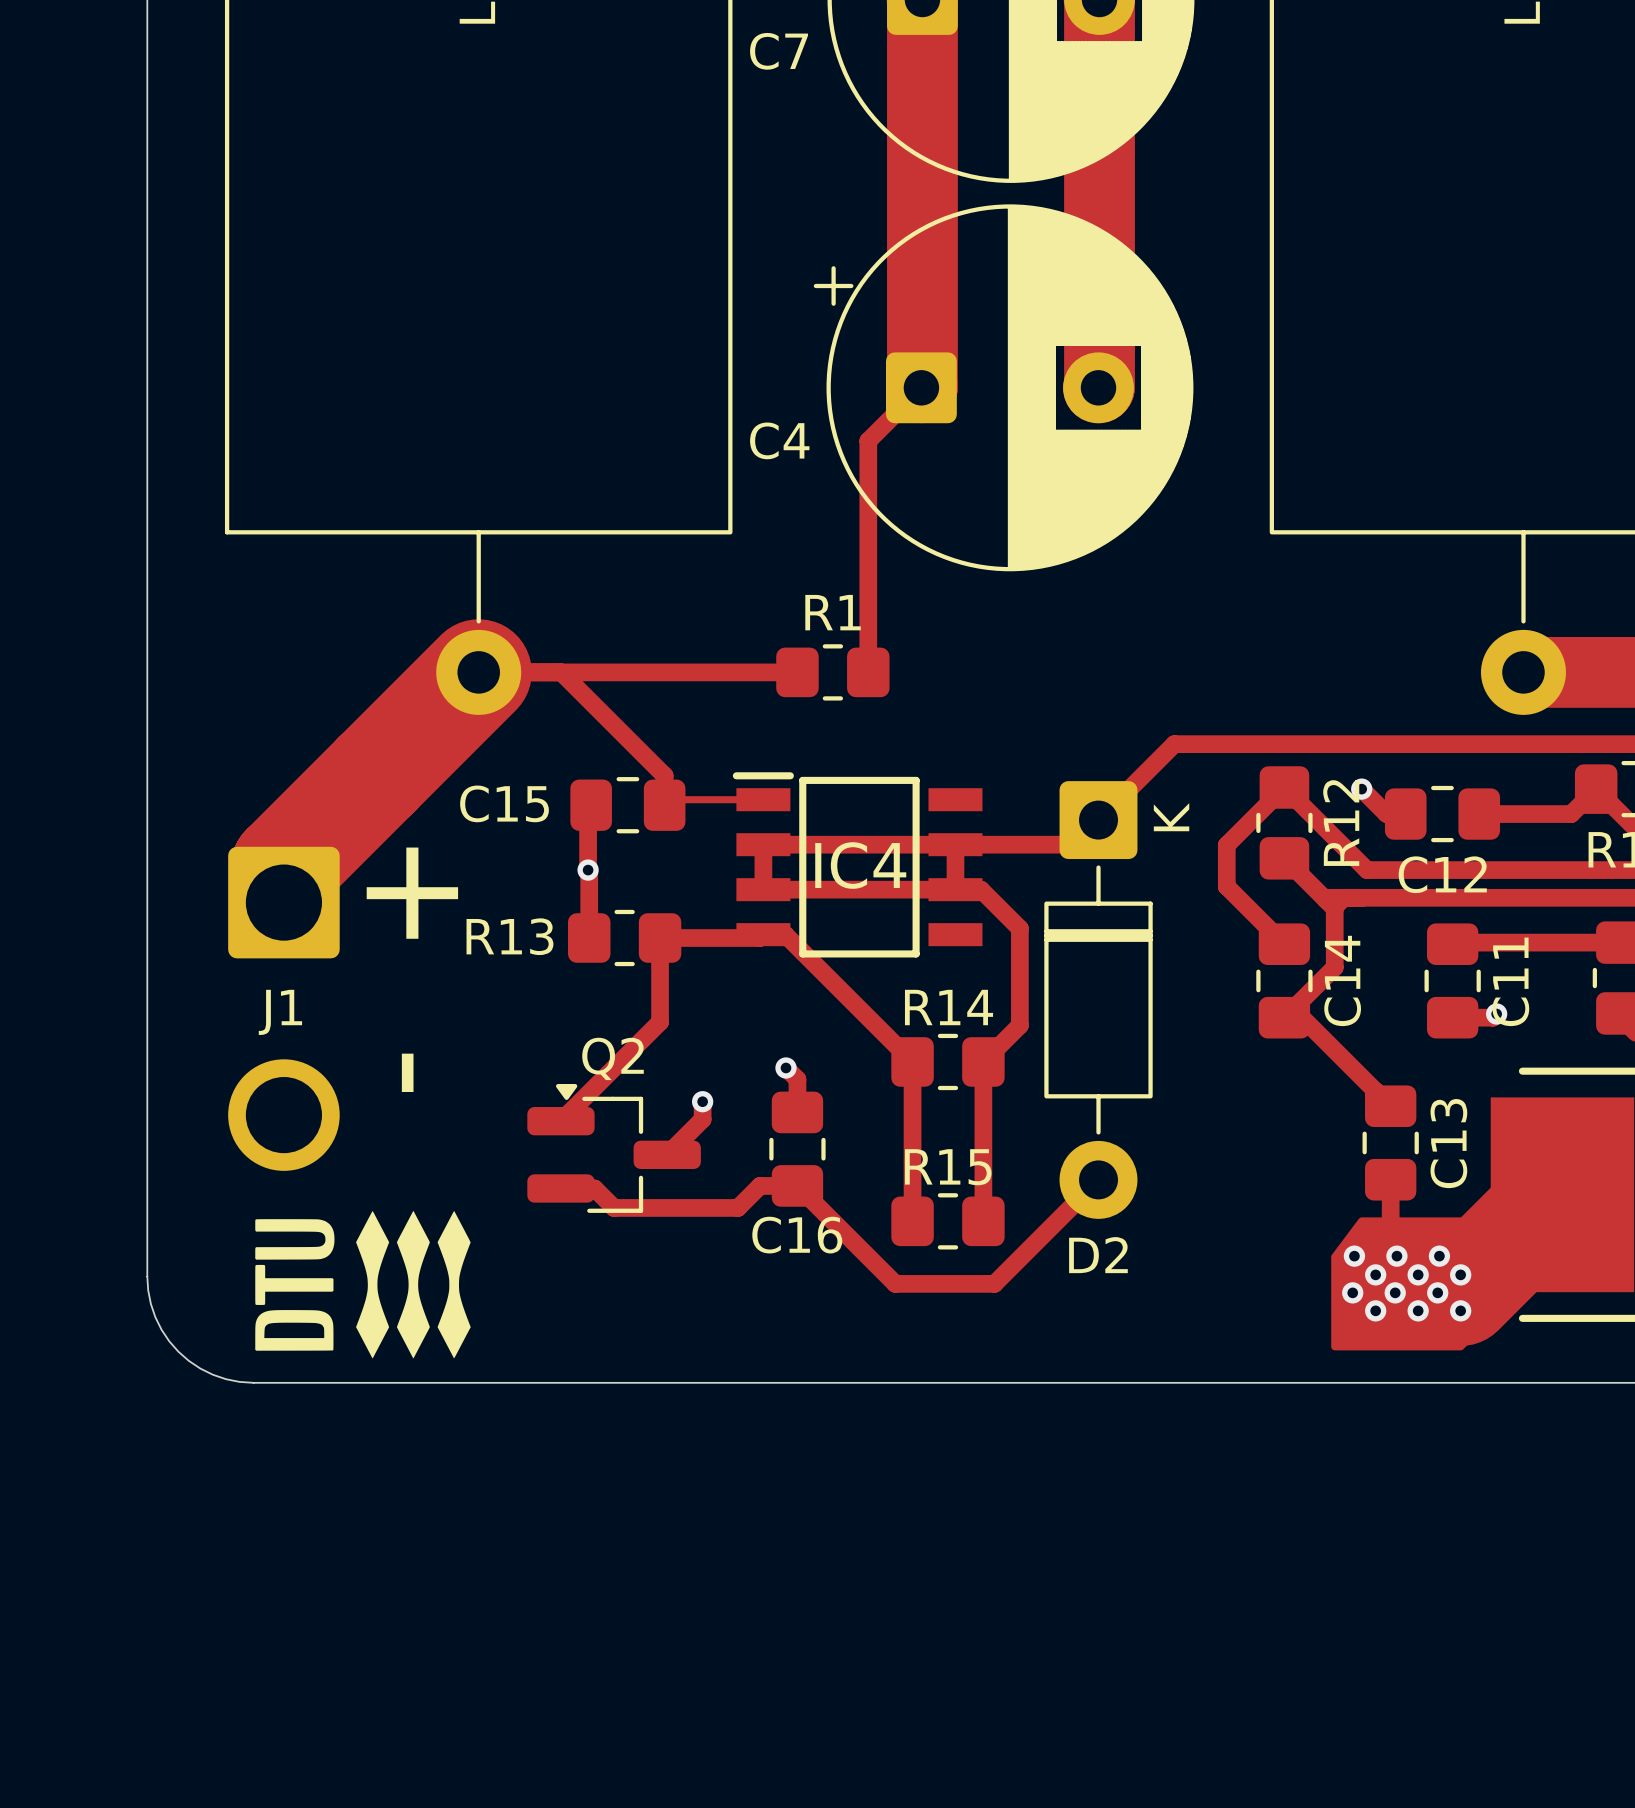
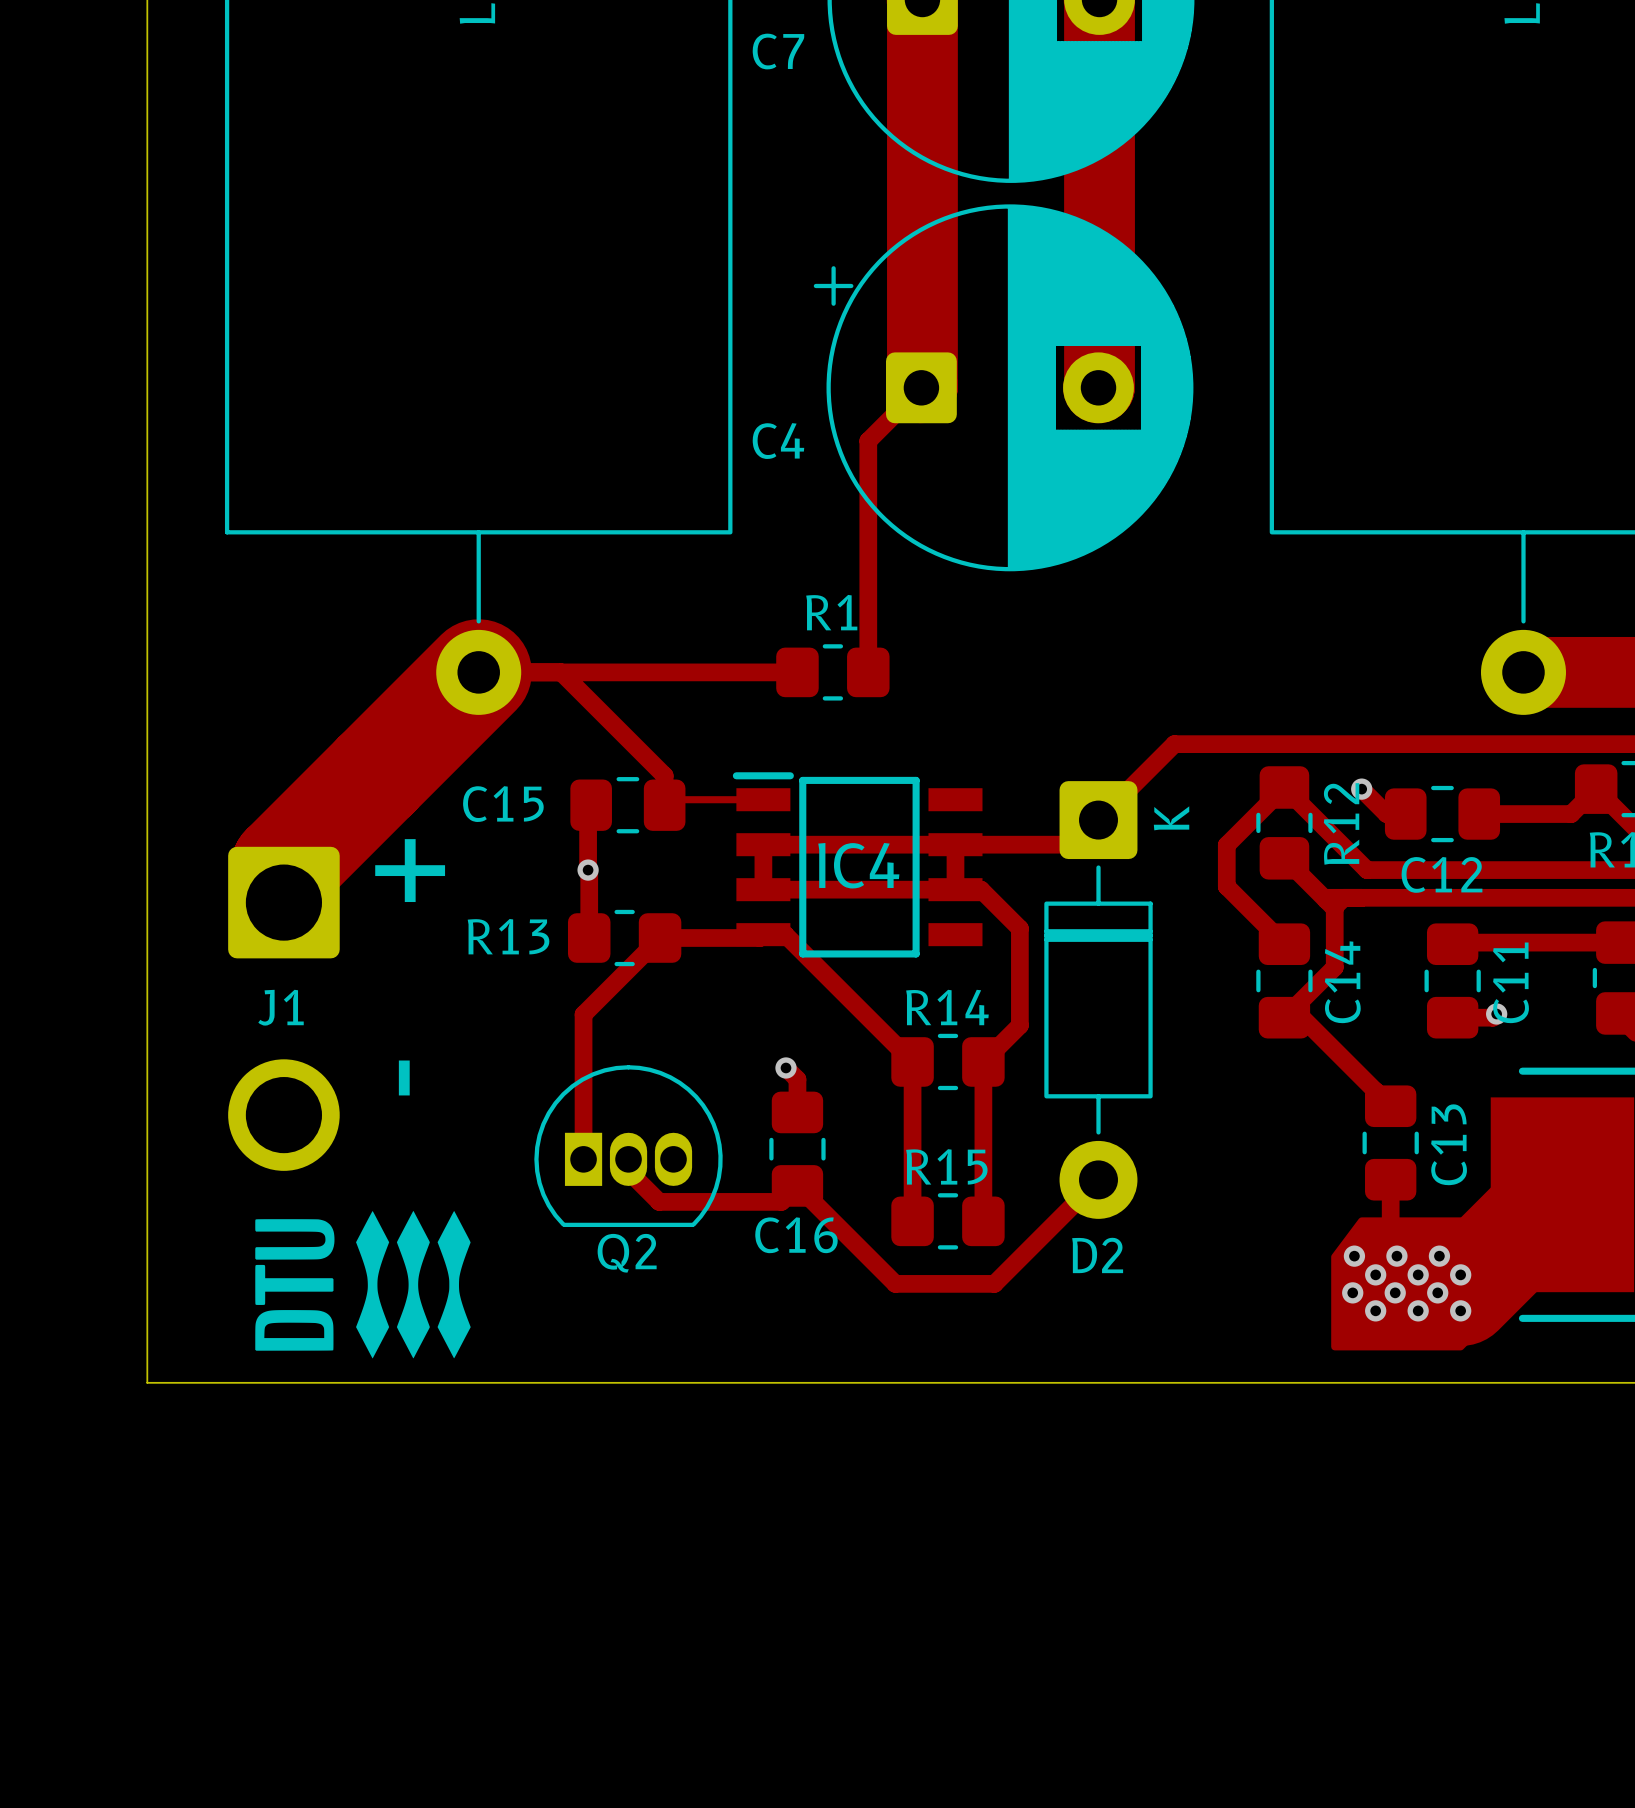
track: (660, 938) (660, 1022) (560, 1121) -> (660, 938) (583, 1014) (583, 1159)
Q2 name position: Q2 (613, 1058) -> Q2 (627, 1253)
Q2 footprint: [527, 1083, 701, 1213] -> [534, 1065, 723, 1228]
track: (702, 1101) (702, 1119) (667, 1154) -> none
via: (702, 1101) -> none
track: (797, 1185) (760, 1185) (738, 1207) (614, 1207) (594, 1188) (560, 1188) -> (797, 1185) (781, 1201) (659, 1201) (628, 1171) (628, 1159)
board edge: (147, 1276) (150, 1304) (155, 1317) (169, 1341) (178, 1351) (188, 1360) (212, 1374) (239, 1381) (253, 1382) -> (147, 1276) (147, 1382) (253, 1382)

